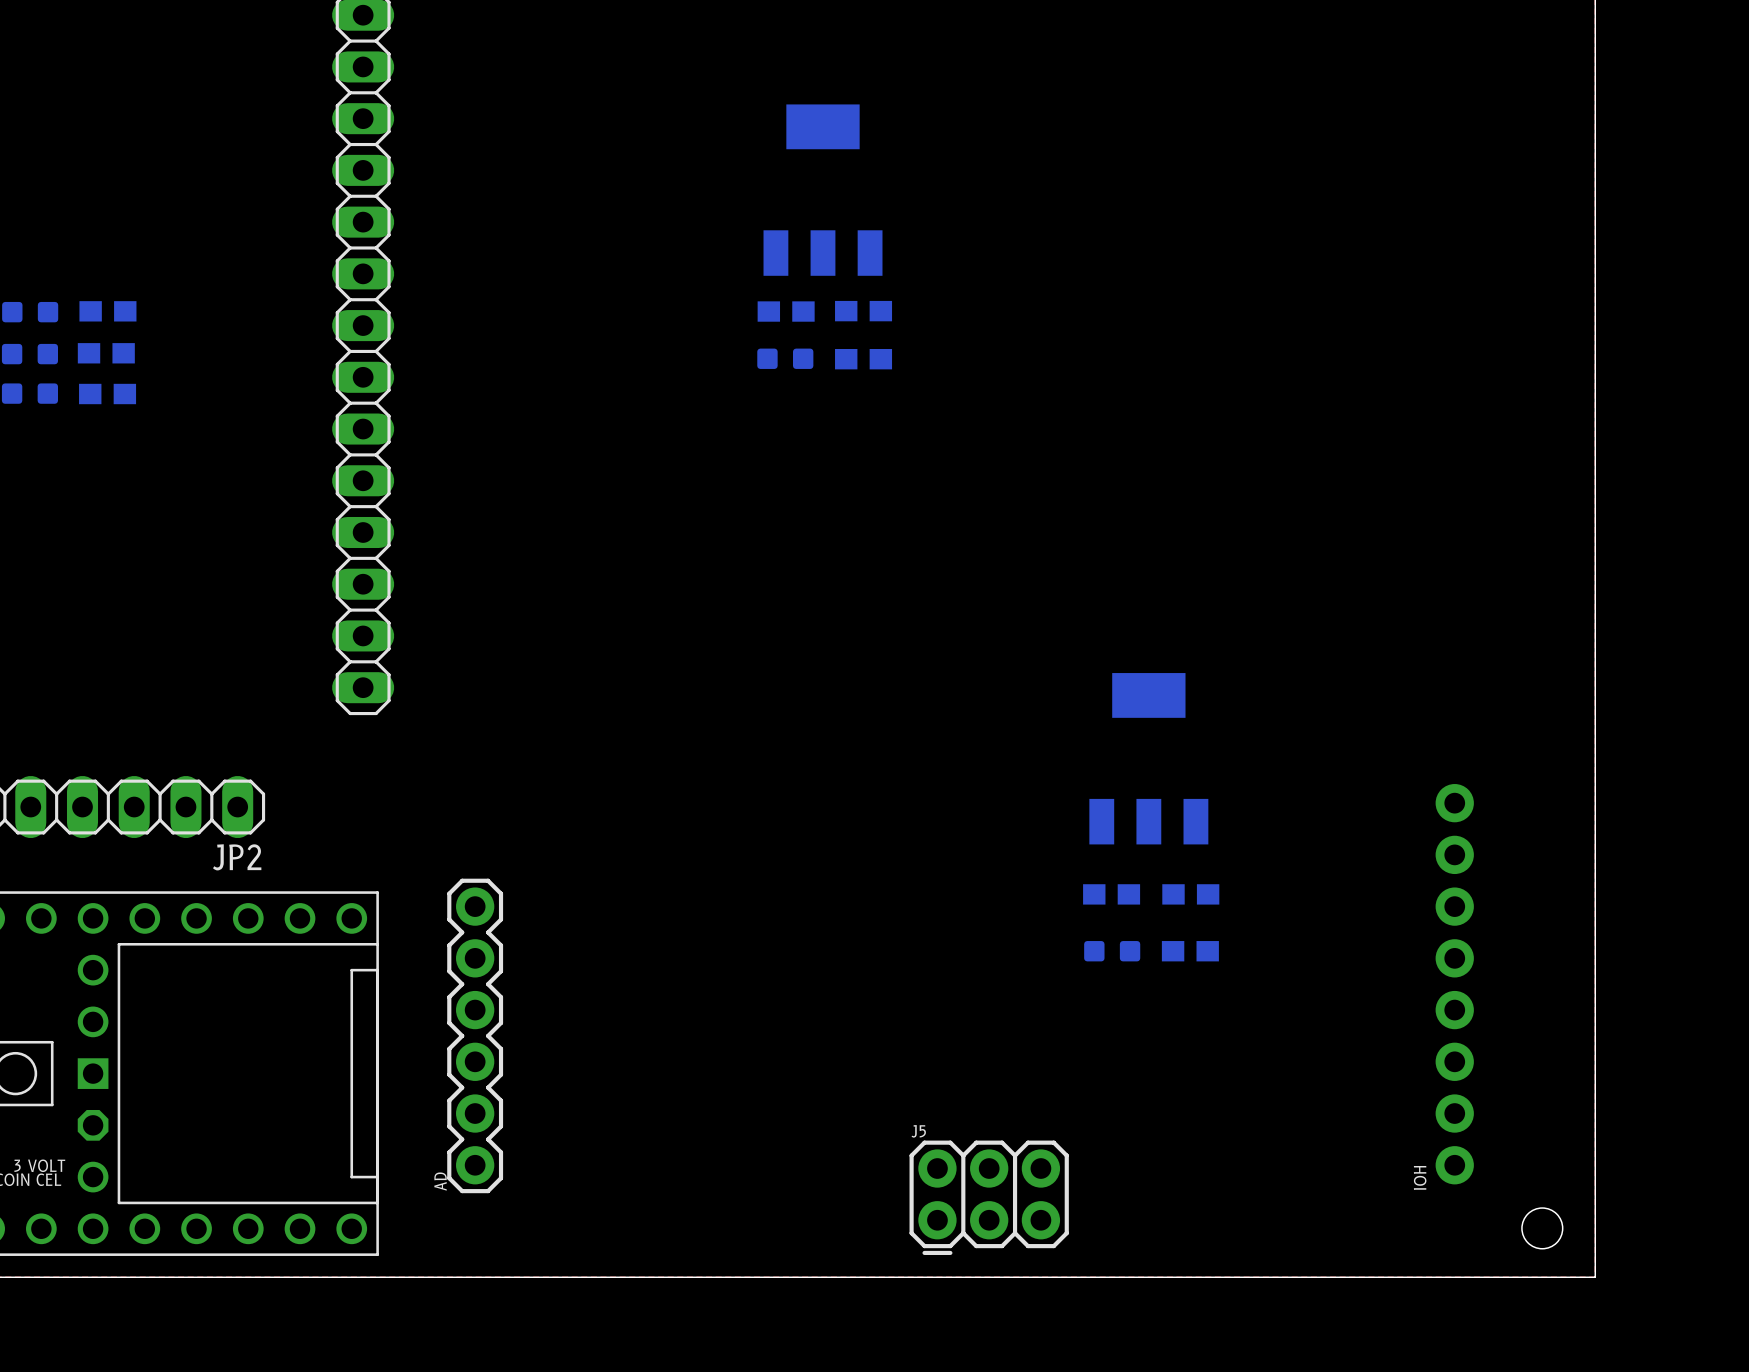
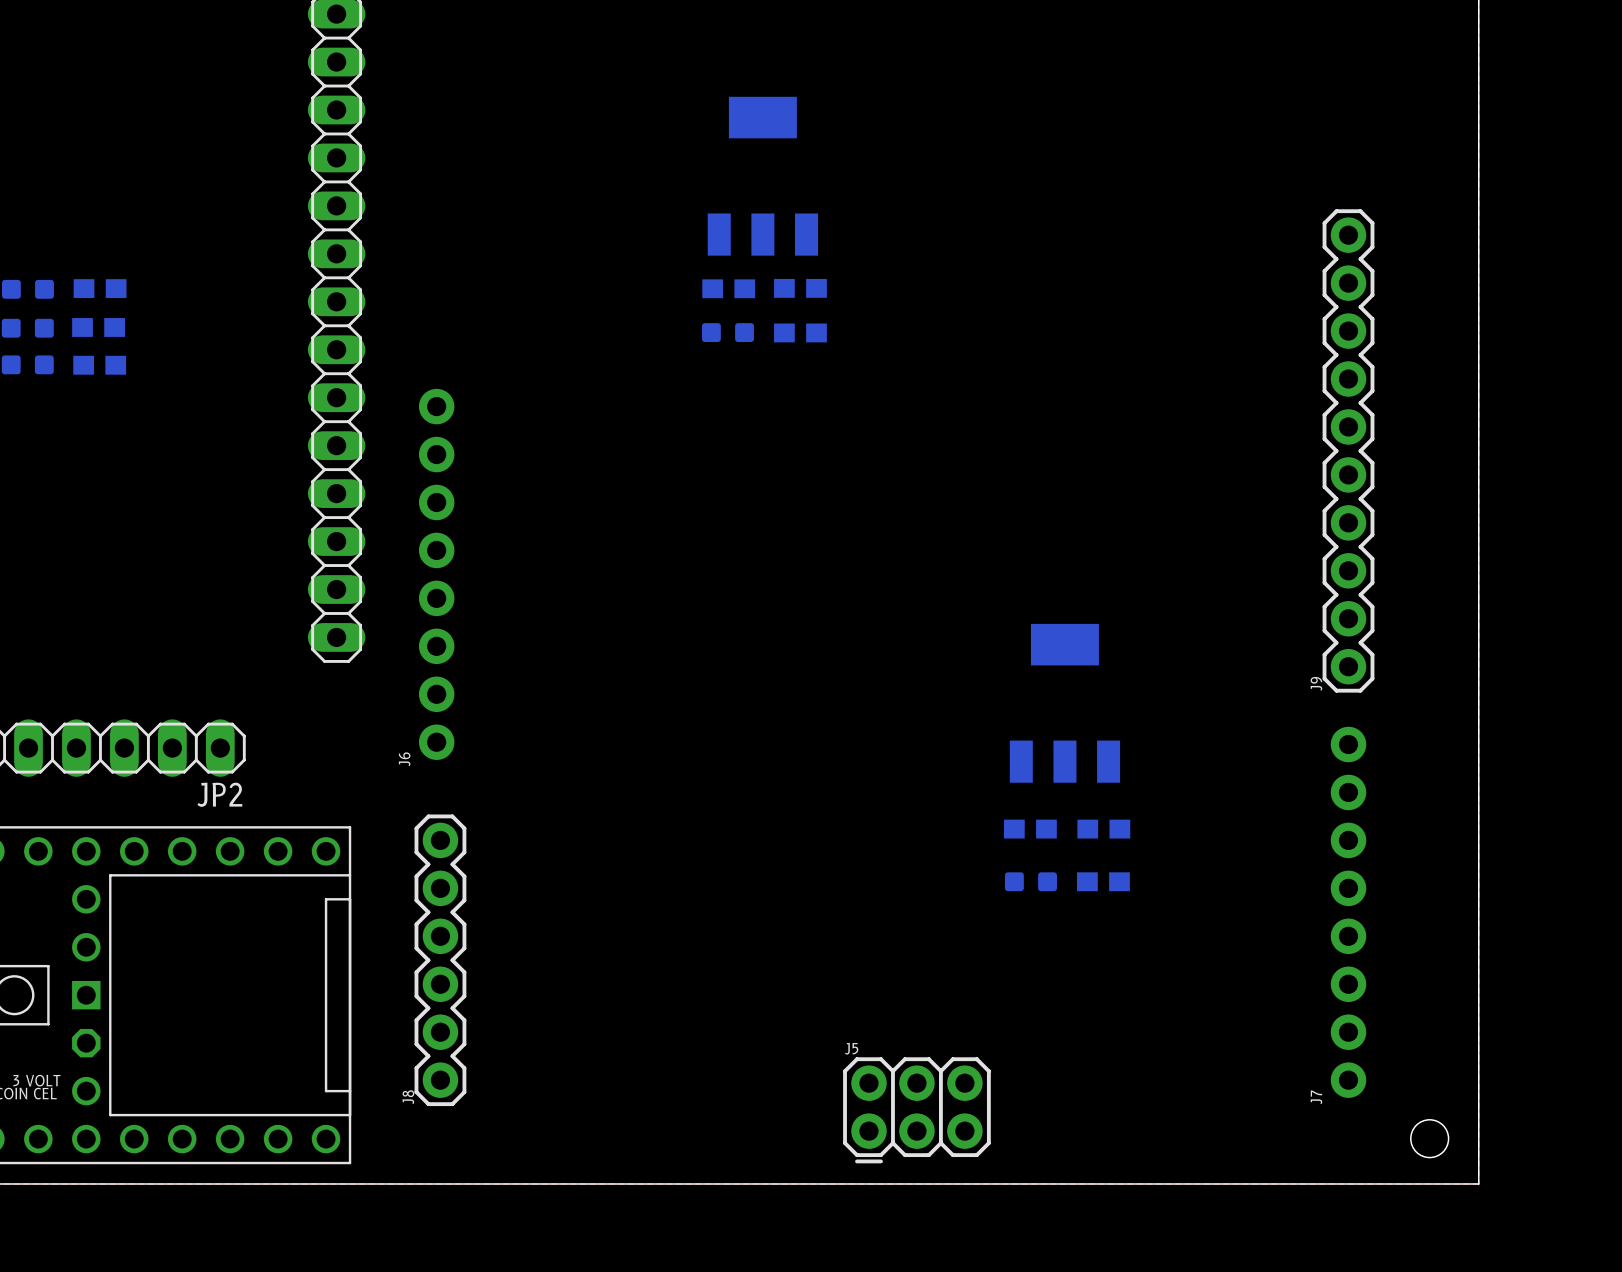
J9: none -> (1348, 450)
J6: none -> (436, 574)
IOH name: IOH (1420, 1177) -> J7 (1316, 1097)
AD name: AD (440, 1181) -> J8 (408, 1097)

